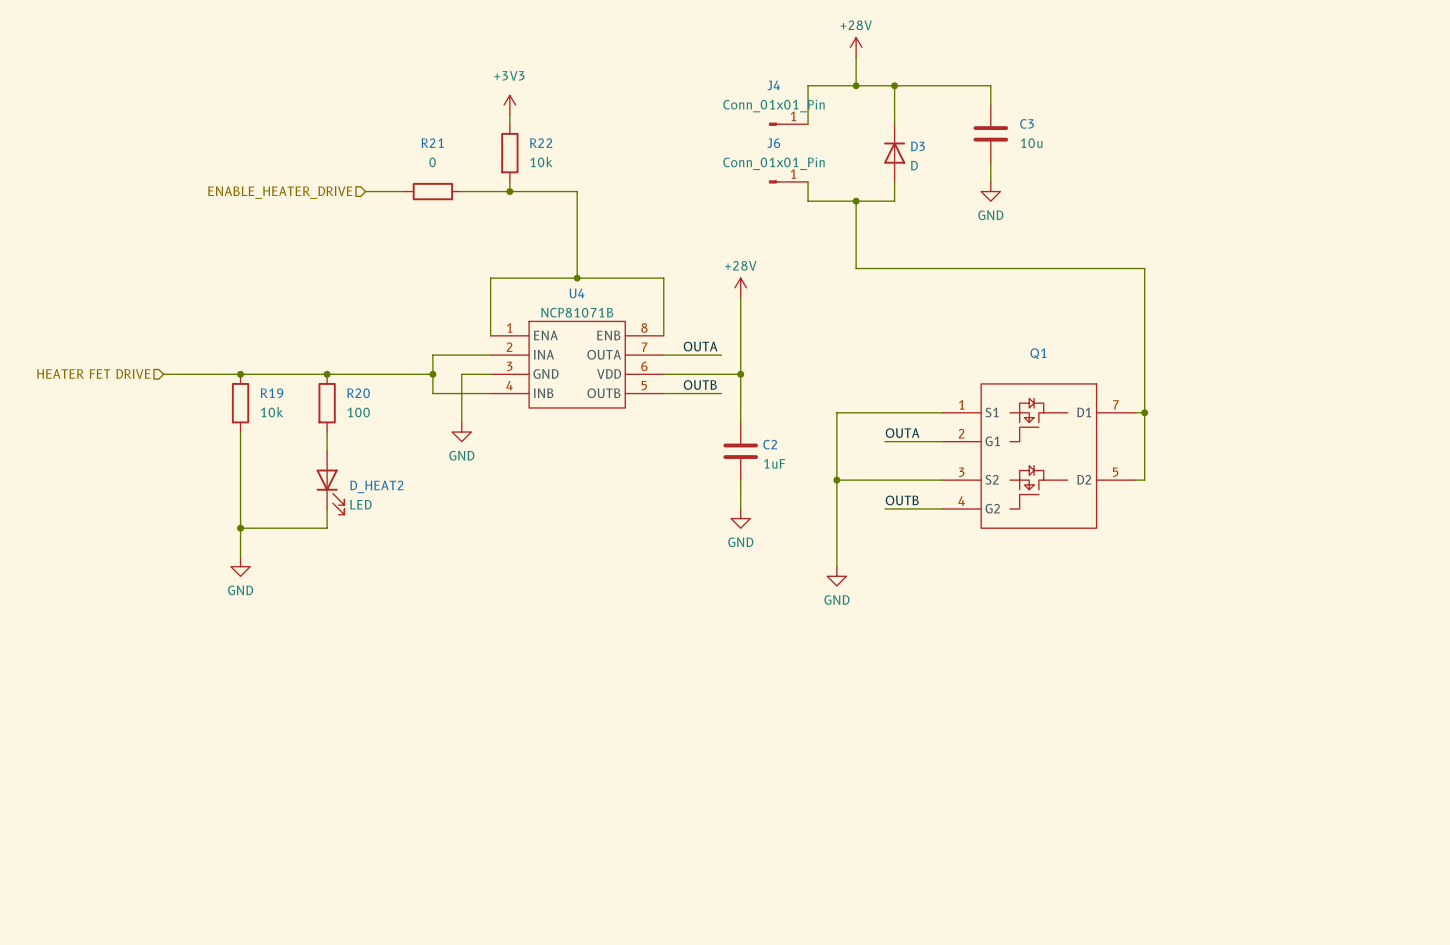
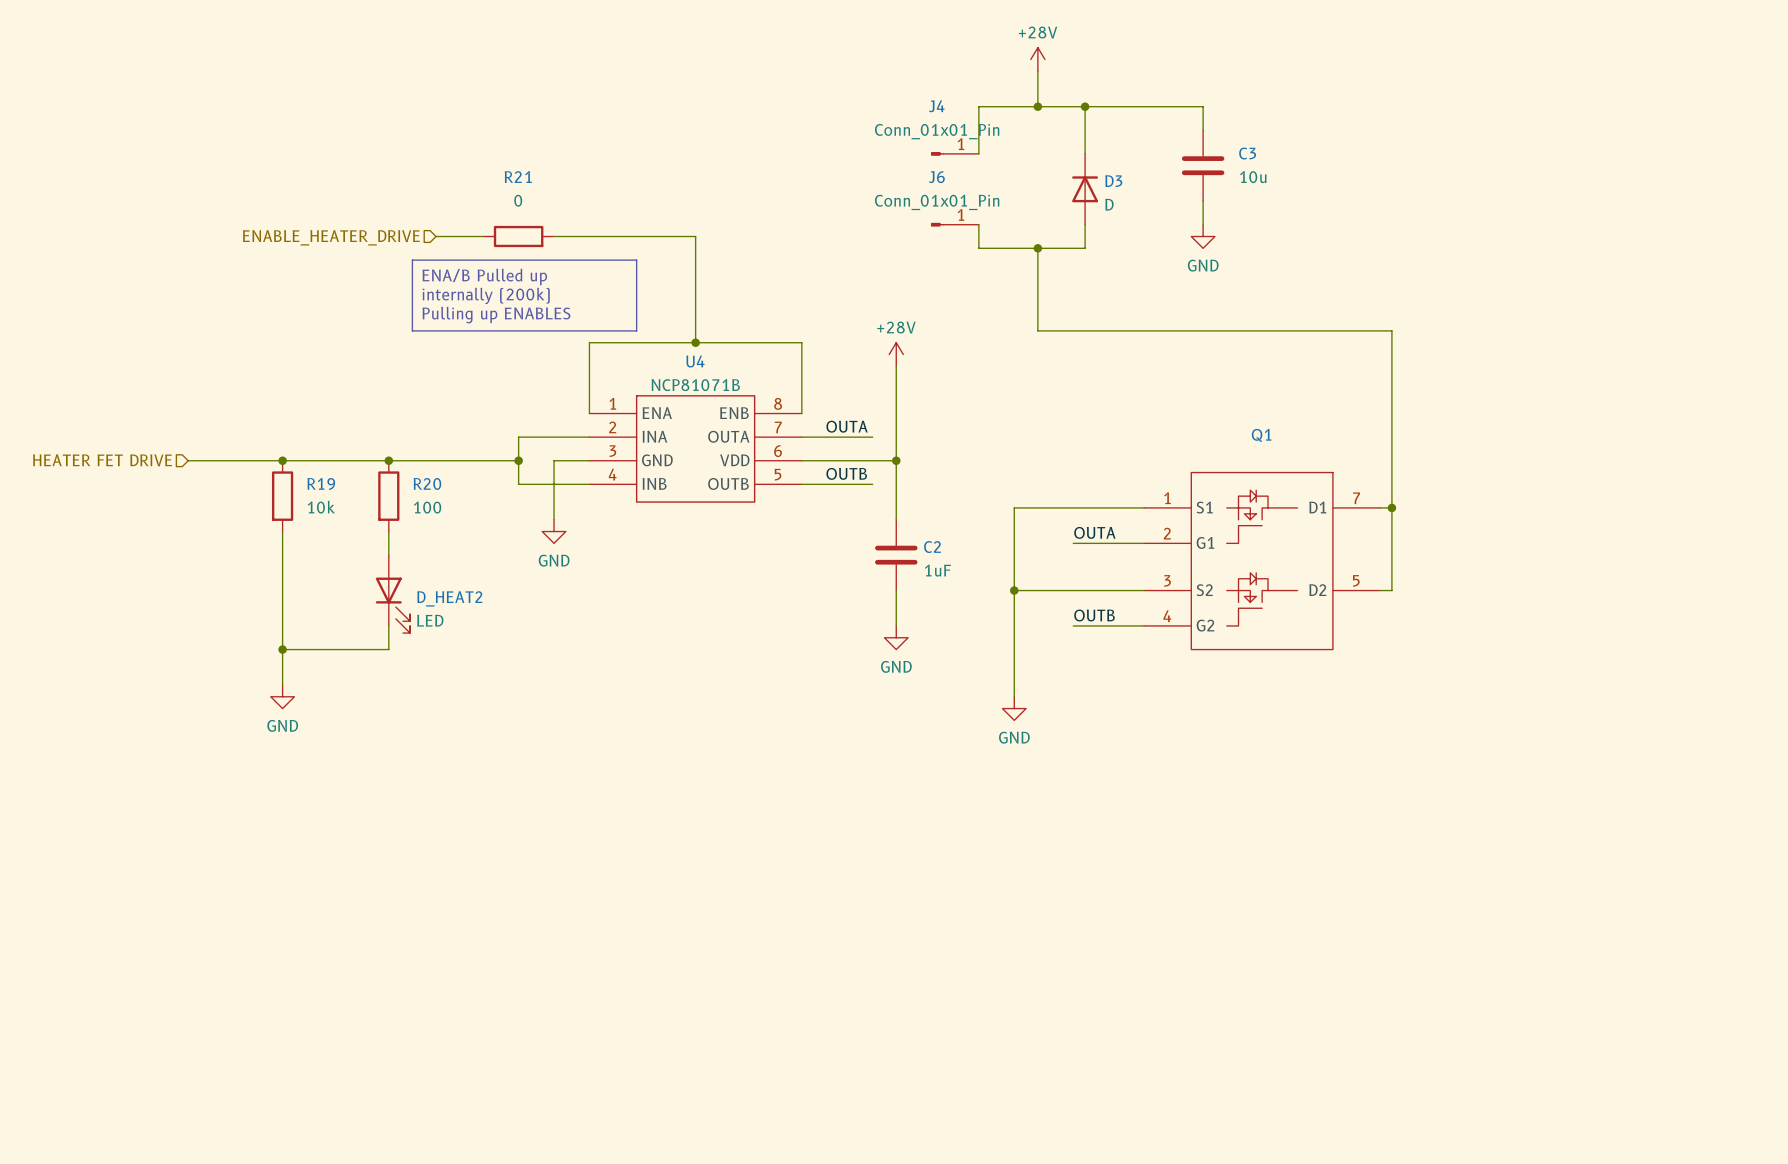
power symbol: +3V3 (509, 105) -> none
wire: (509, 114) (509, 124) -> none
R22: 10k (509, 153) -> none
wire: (509, 181) (509, 191) -> none
junction: (509, 191) -> none
line: none -> (412, 260) (636, 260) (636, 330) (412, 330) (412, 260)
text: none -> ENA/B Pulled up (484, 276)
text: none -> internally (200k) (486, 295)
text: none -> Pulling up ENABLES (496, 315)

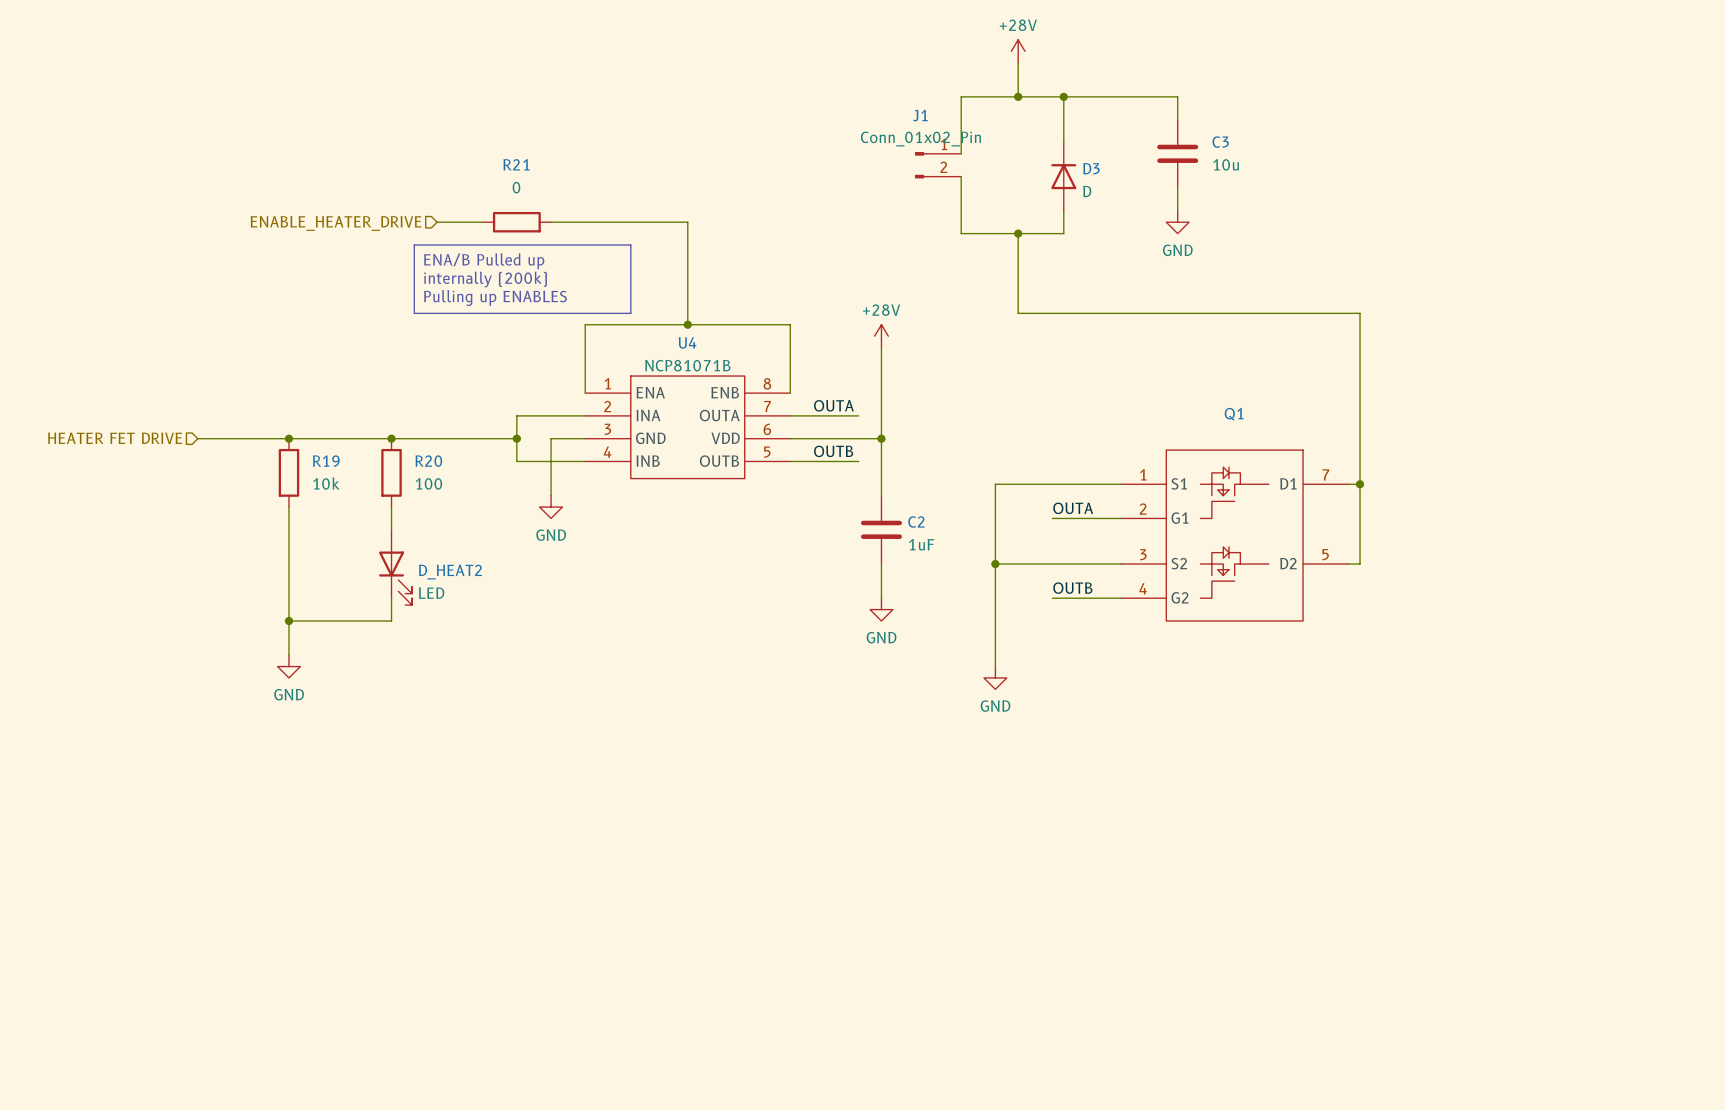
J4: Conn_01x01_Pin (954, 153) -> none
wire: none -> (961, 142) (961, 153)
J1: none -> Conn_01x02_Pin (938, 165)
wire: none -> (961, 176) (961, 210)
J6: Conn_01x01_Pin (954, 224) -> none

